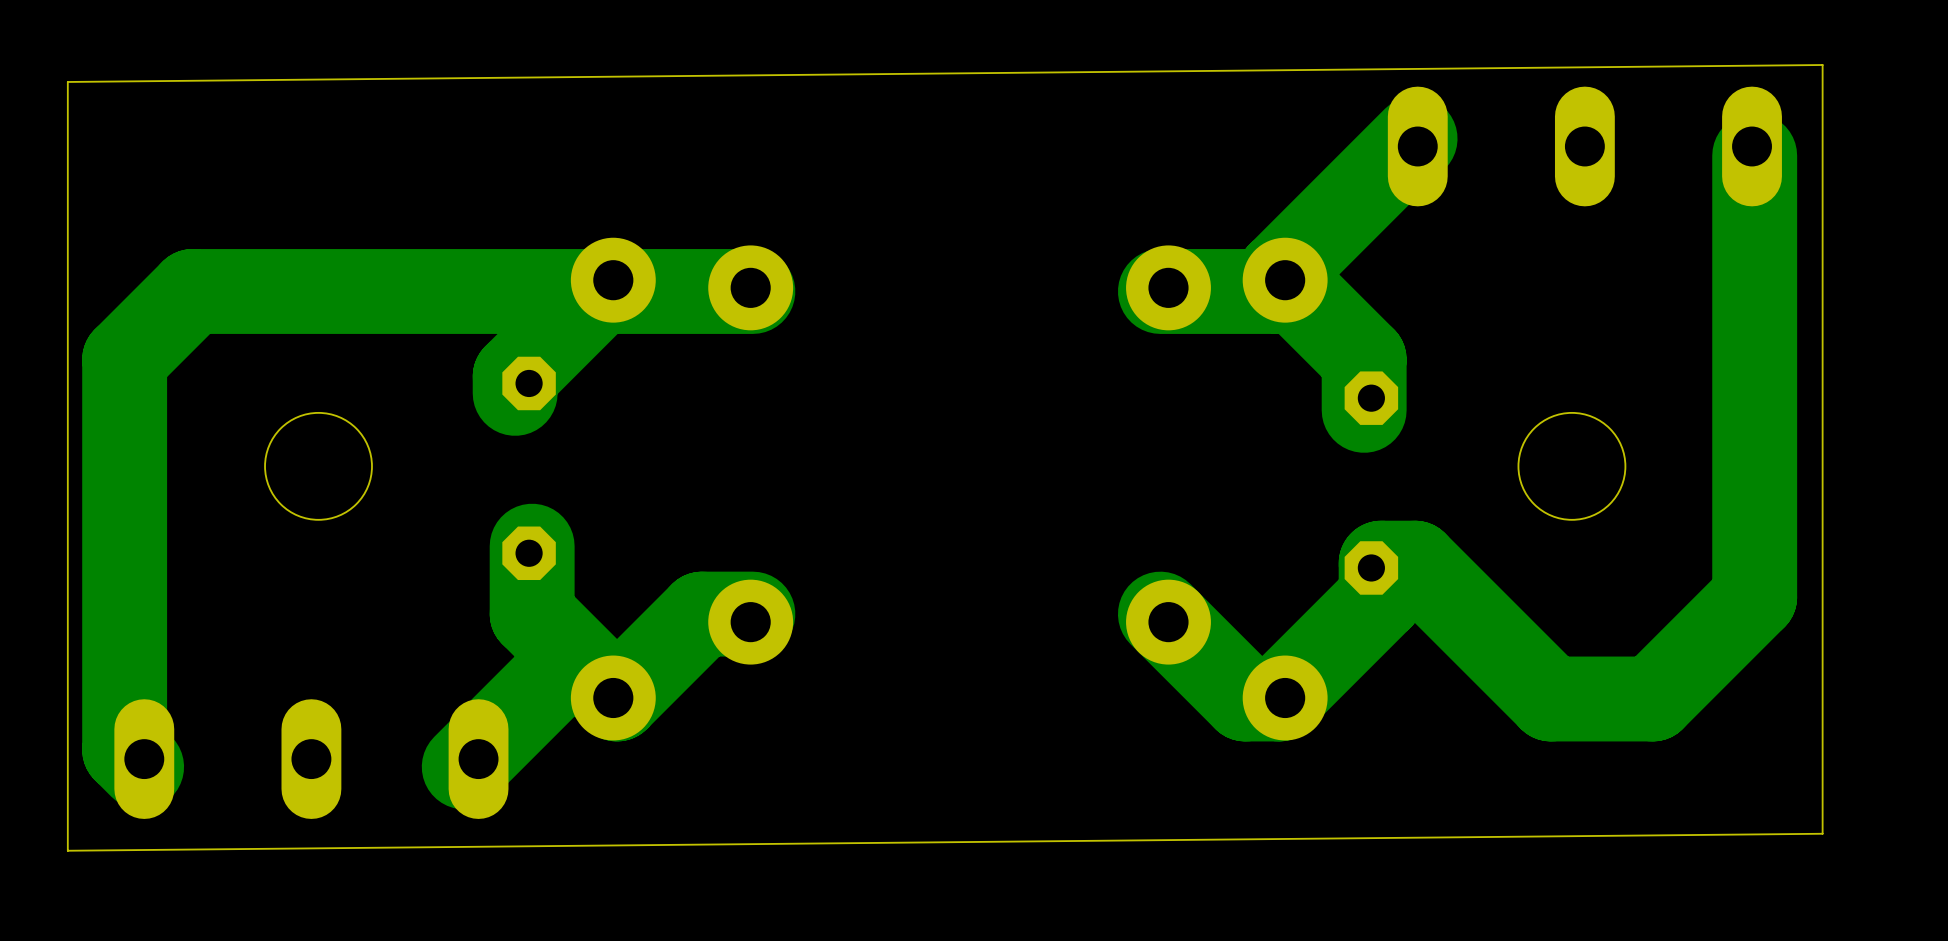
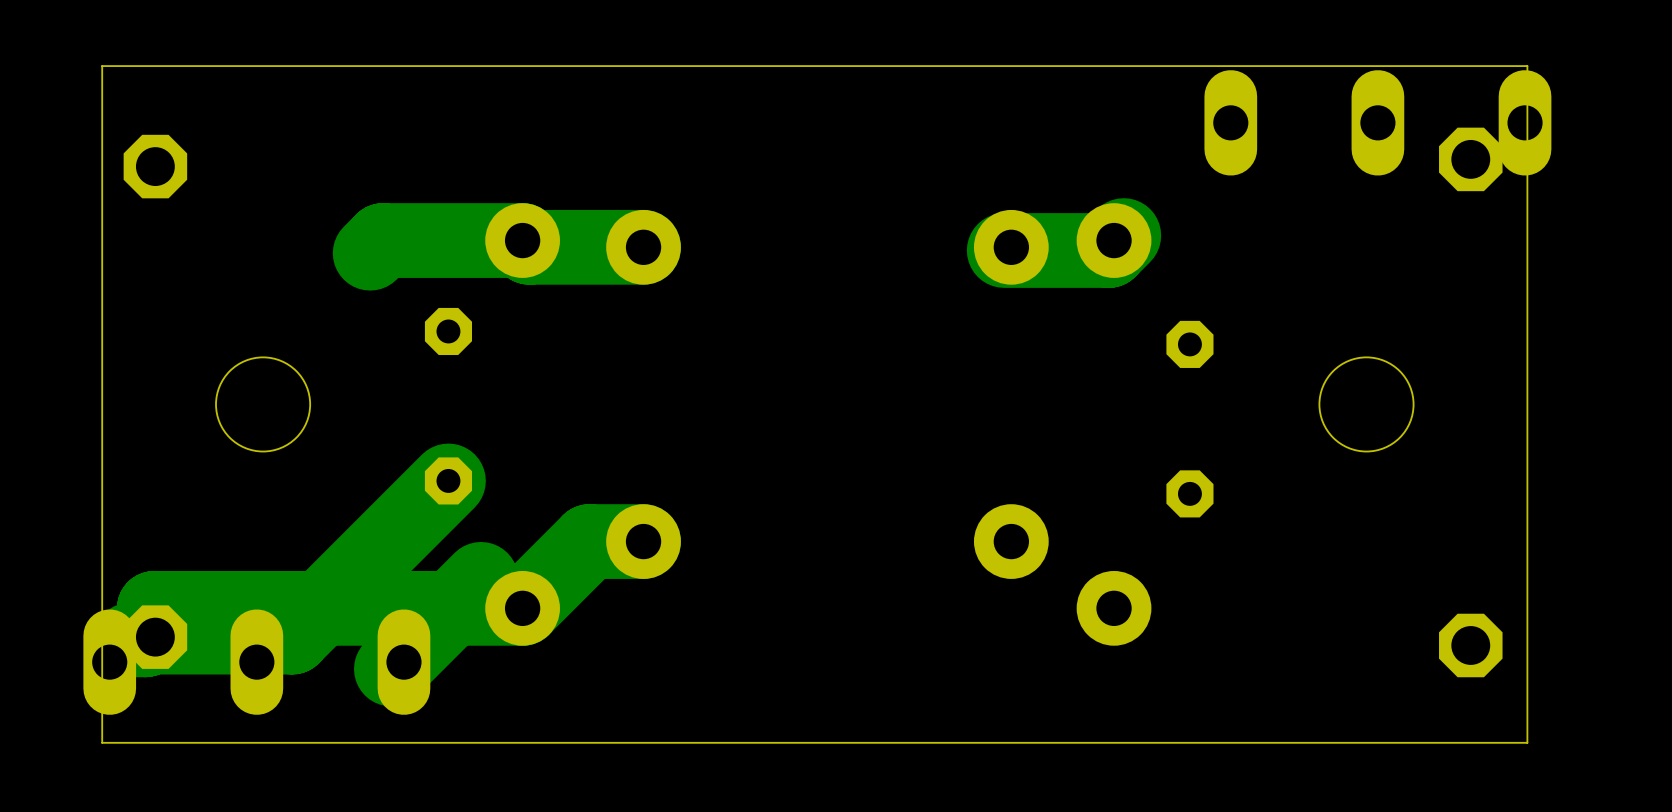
board edge: (1822, 65) (67, 81) (67, 850) (1822, 833) (1822, 65) -> (1527, 66) (1527, 742) (102, 742) (102, 66) (1527, 66)
track: (1415, 138) (1279, 274) (1364, 359) (1364, 410) -> none
track: (1754, 155) (1754, 597) (1652, 699) (1550, 699) (1415, 563) (1381, 563) (1381, 597) (1279, 699) (1245, 699) (1160, 614) -> none
part: none -> (1470, 159)
part: none -> (155, 166)
track: none -> (643, 247) (529, 247) (522, 240) (382, 240) (370, 253)
track: (600, 291) (515, 376) (515, 393) -> none
track: (752, 291) (192, 291) (124, 359) (124, 749) (141, 766) -> none
track: (532, 546) (532, 614) (617, 699) (701, 614) (752, 614) -> none
track: none -> (448, 480) (292, 637) (155, 637) (154, 608) (522, 608) (589, 541) (643, 541)
part: none -> (155, 637)
part: none -> (1470, 645)

